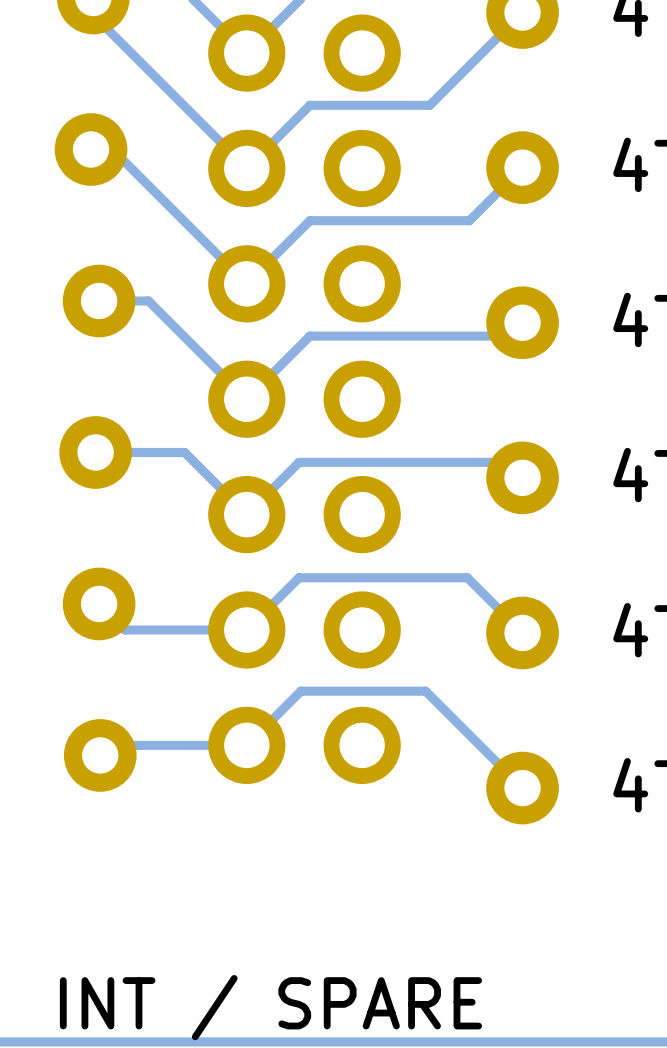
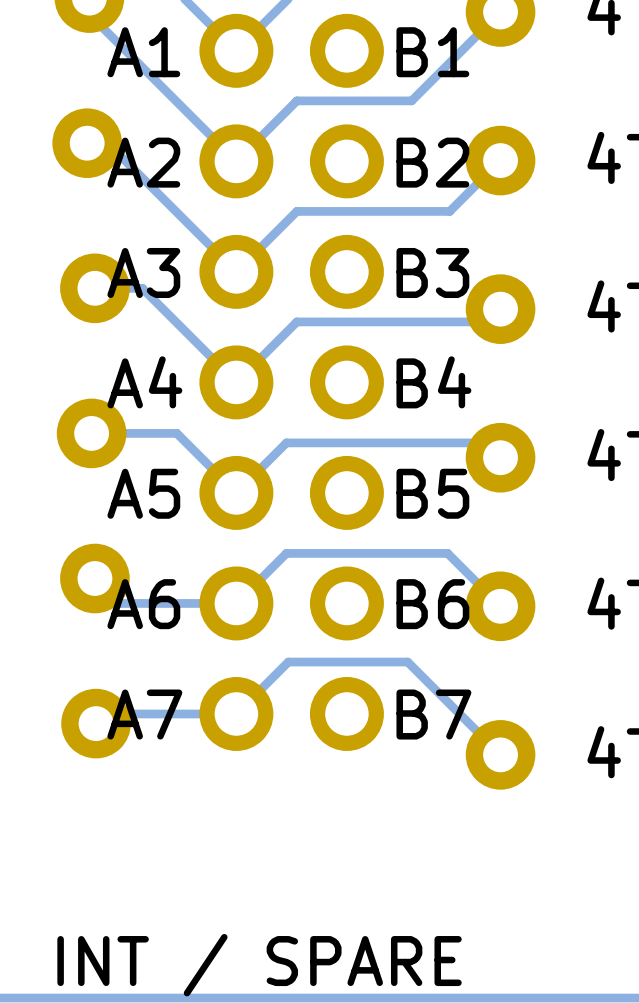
text: none -> A1 (143, 52)
text: none -> B1 (432, 52)
text: none -> A2 (143, 162)
text: none -> B2 (432, 162)
text: none -> A3 (143, 272)
text: none -> B3 (432, 272)
text: none -> A4 (144, 382)
text: none -> B4 (433, 382)
text: none -> A5 (143, 493)
text: none -> B5 (432, 493)
text: none -> A6 (143, 604)
text: none -> B6 (432, 604)
text: none -> A7 (144, 714)
text: none -> B7 (433, 714)

